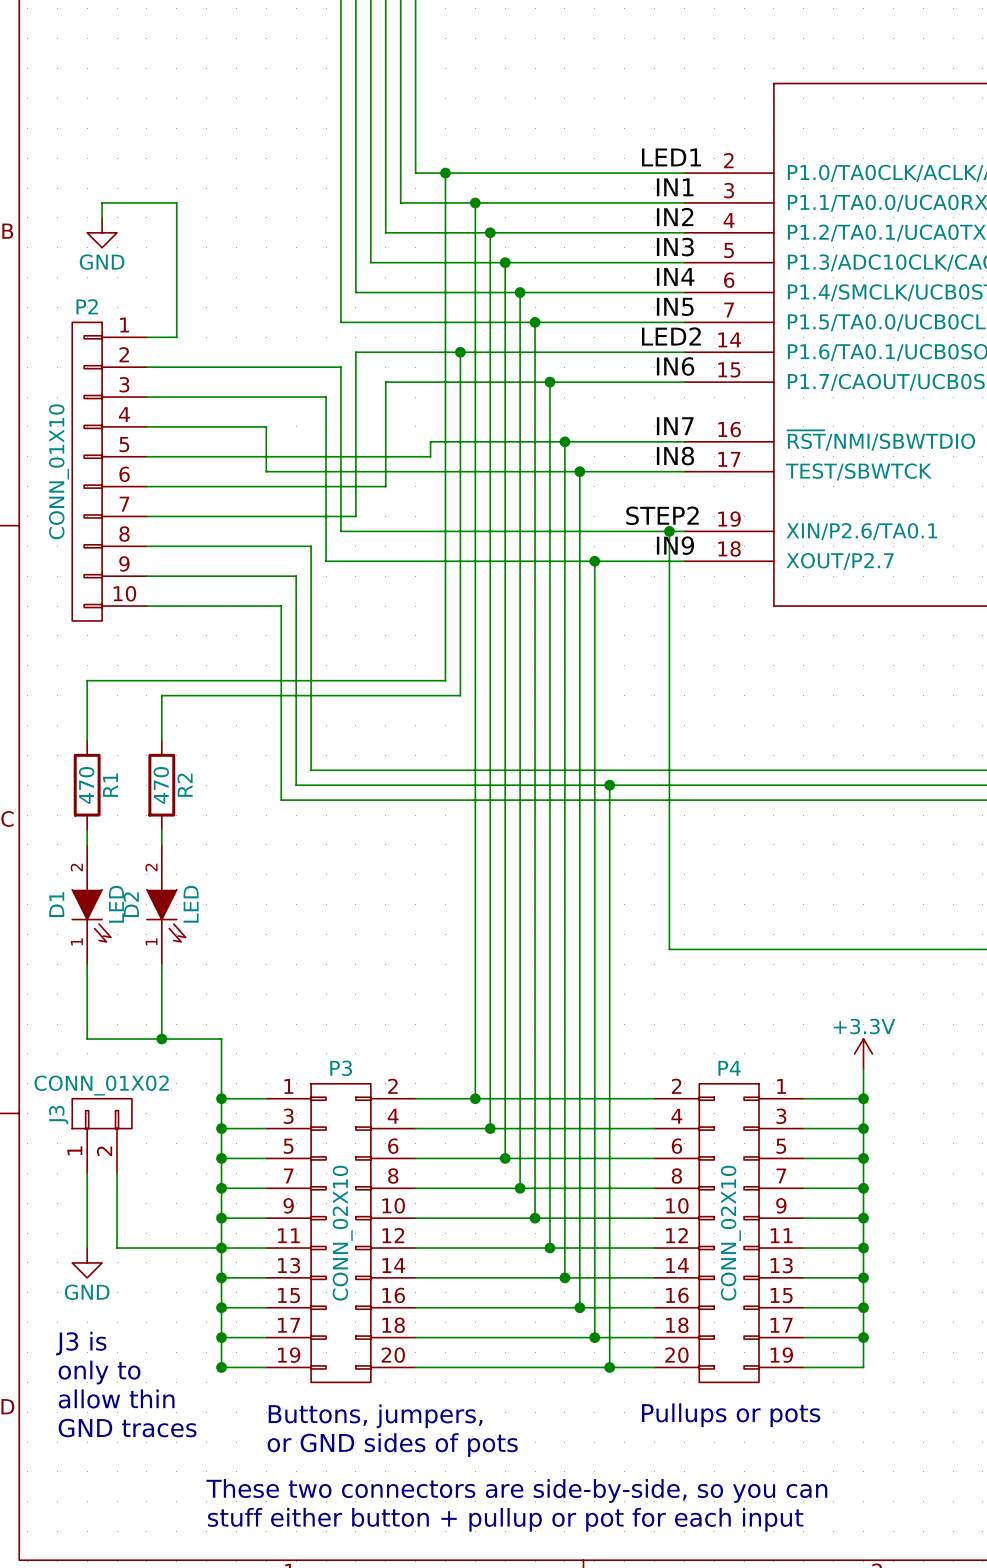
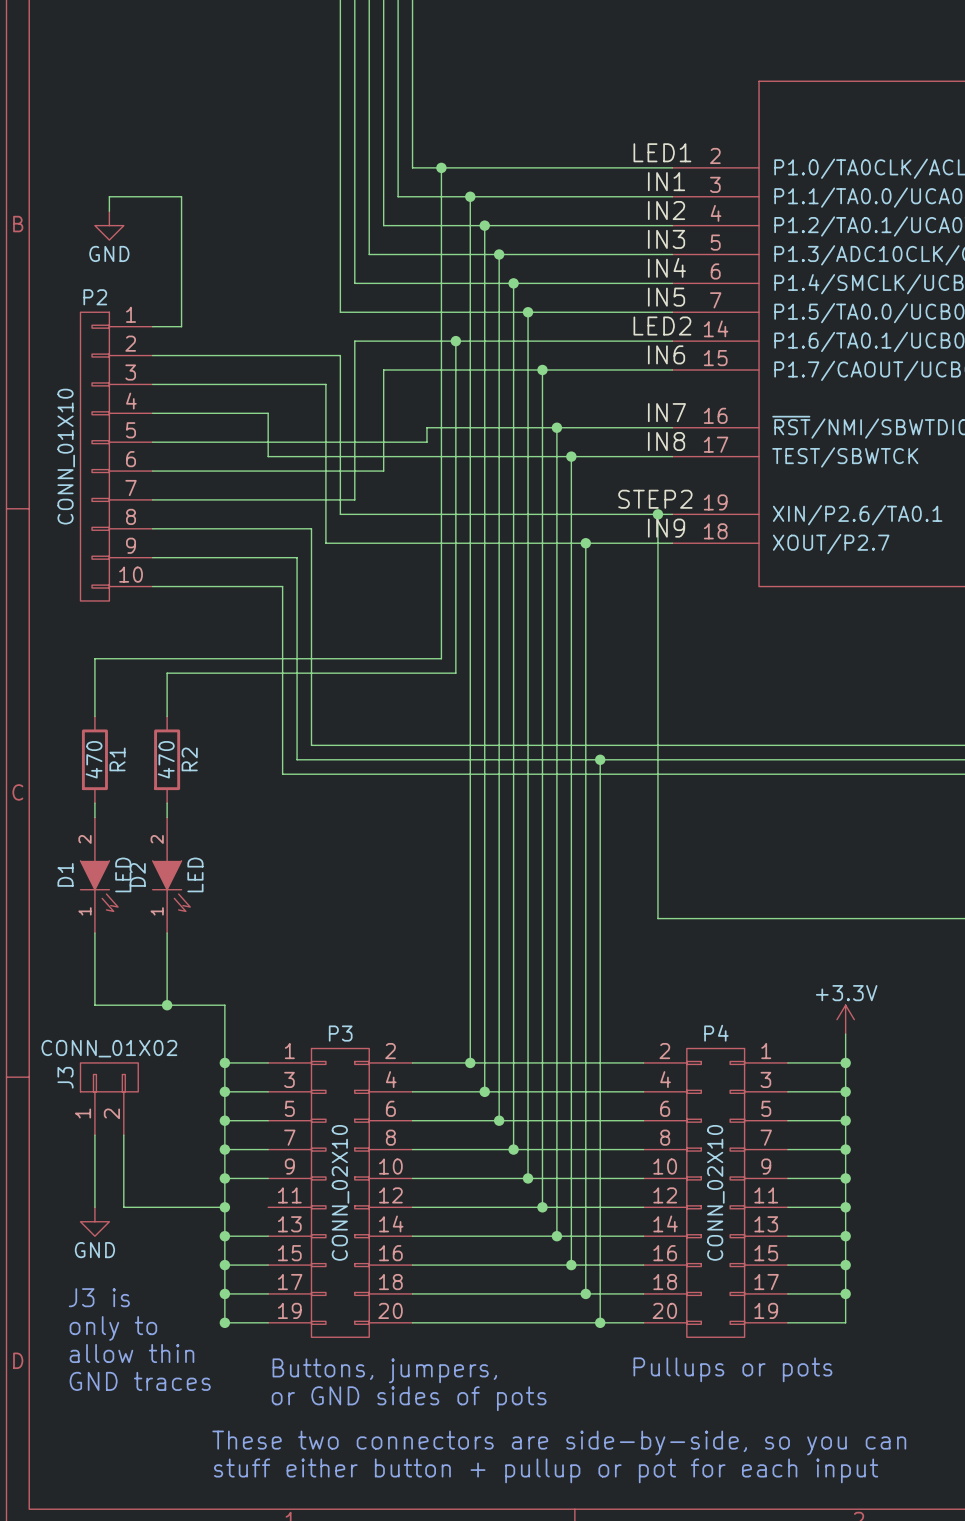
wire: (221, 1248) (266, 1248) -> none

